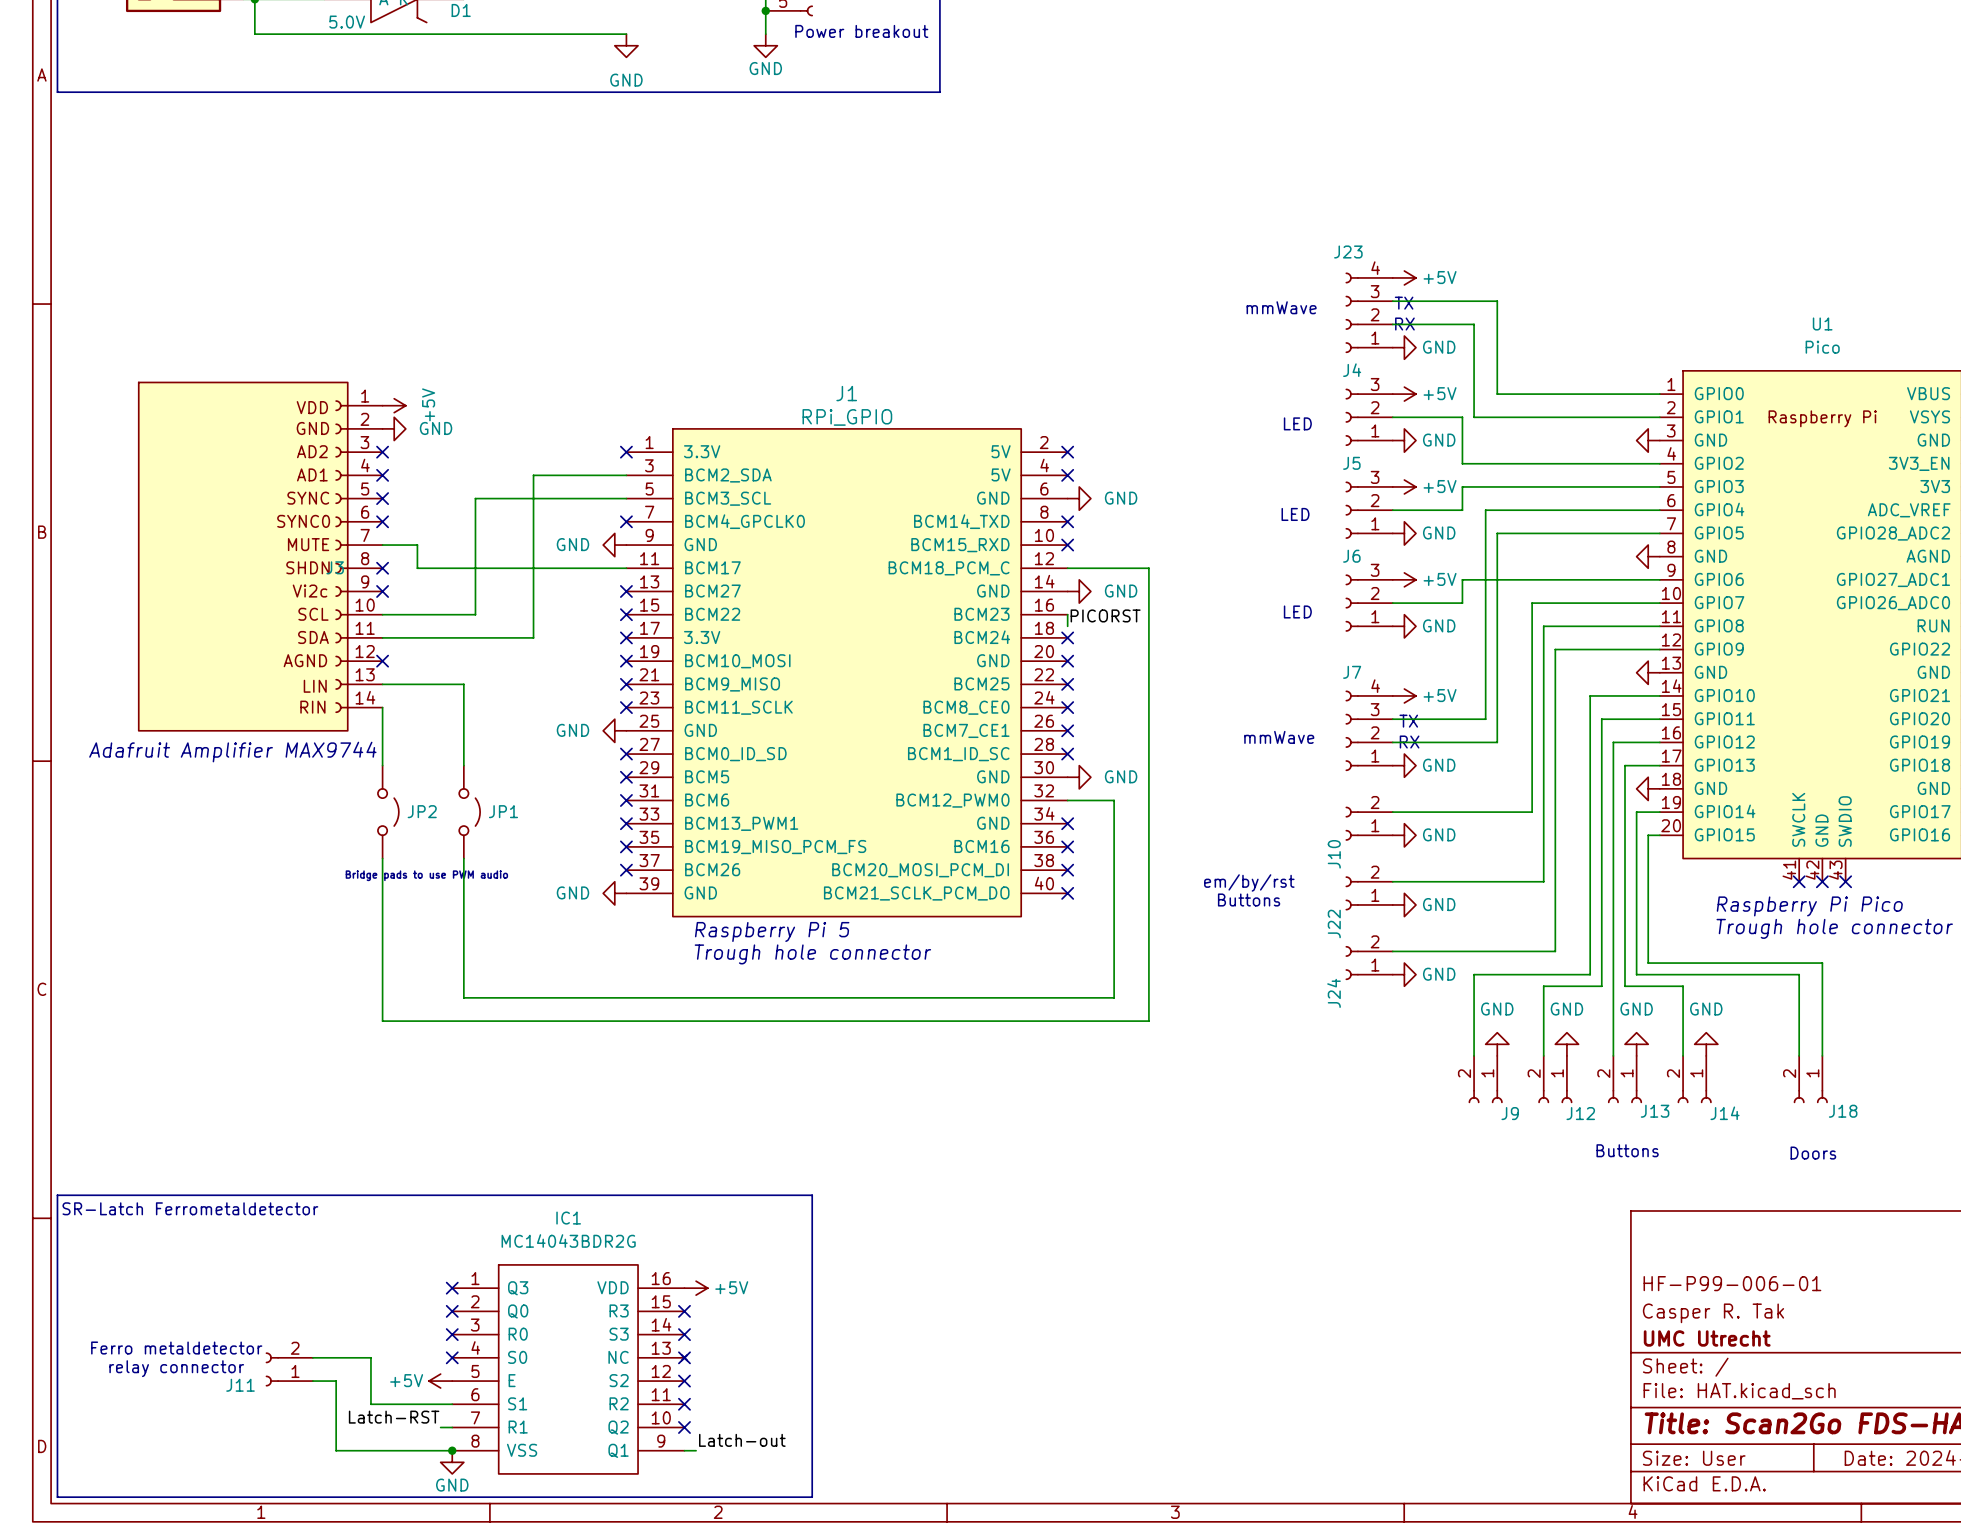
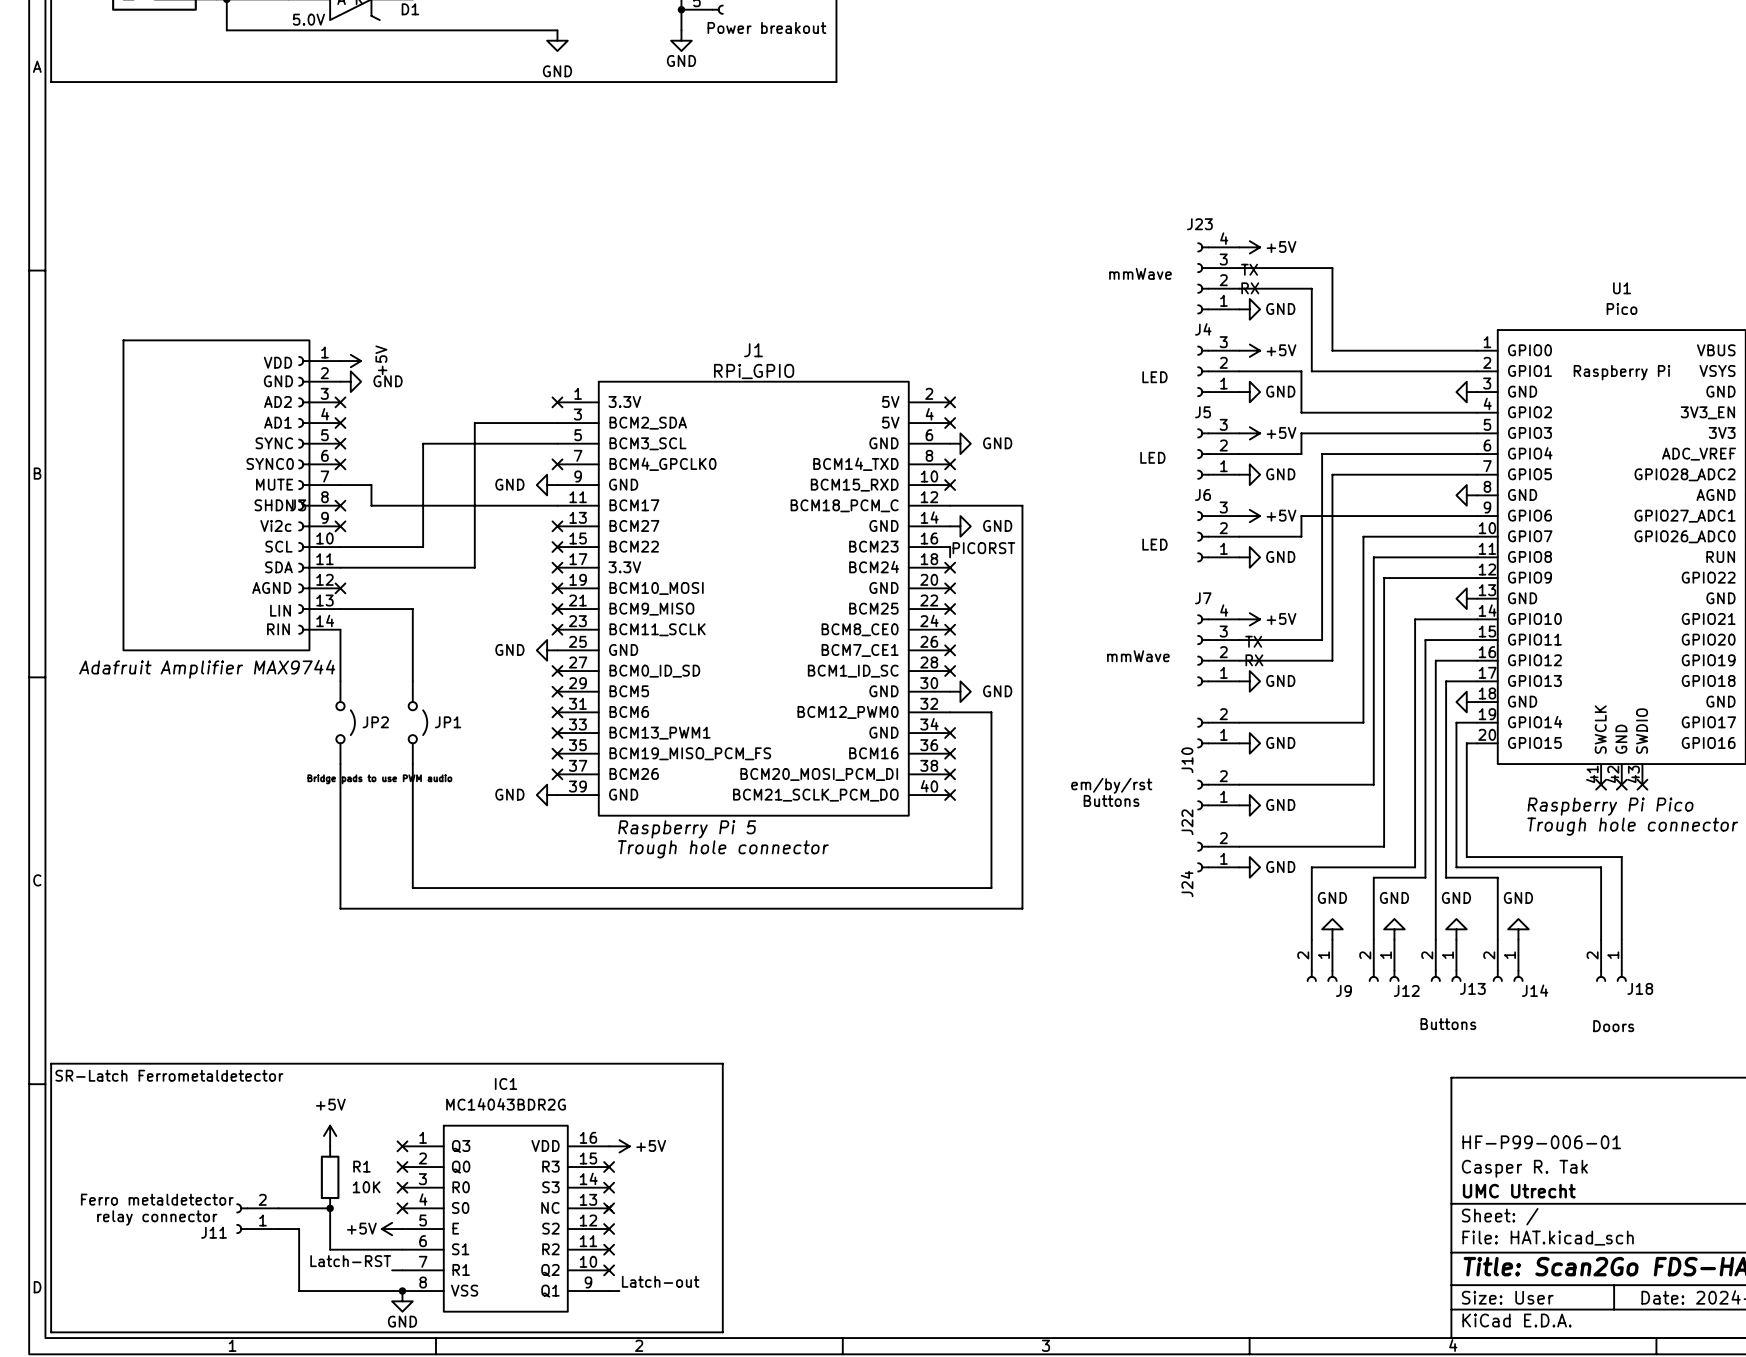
power symbol: none -> +5V (330, 1136)
R1: none -> 10K (330, 1177)
junction: none -> (330, 1208)

